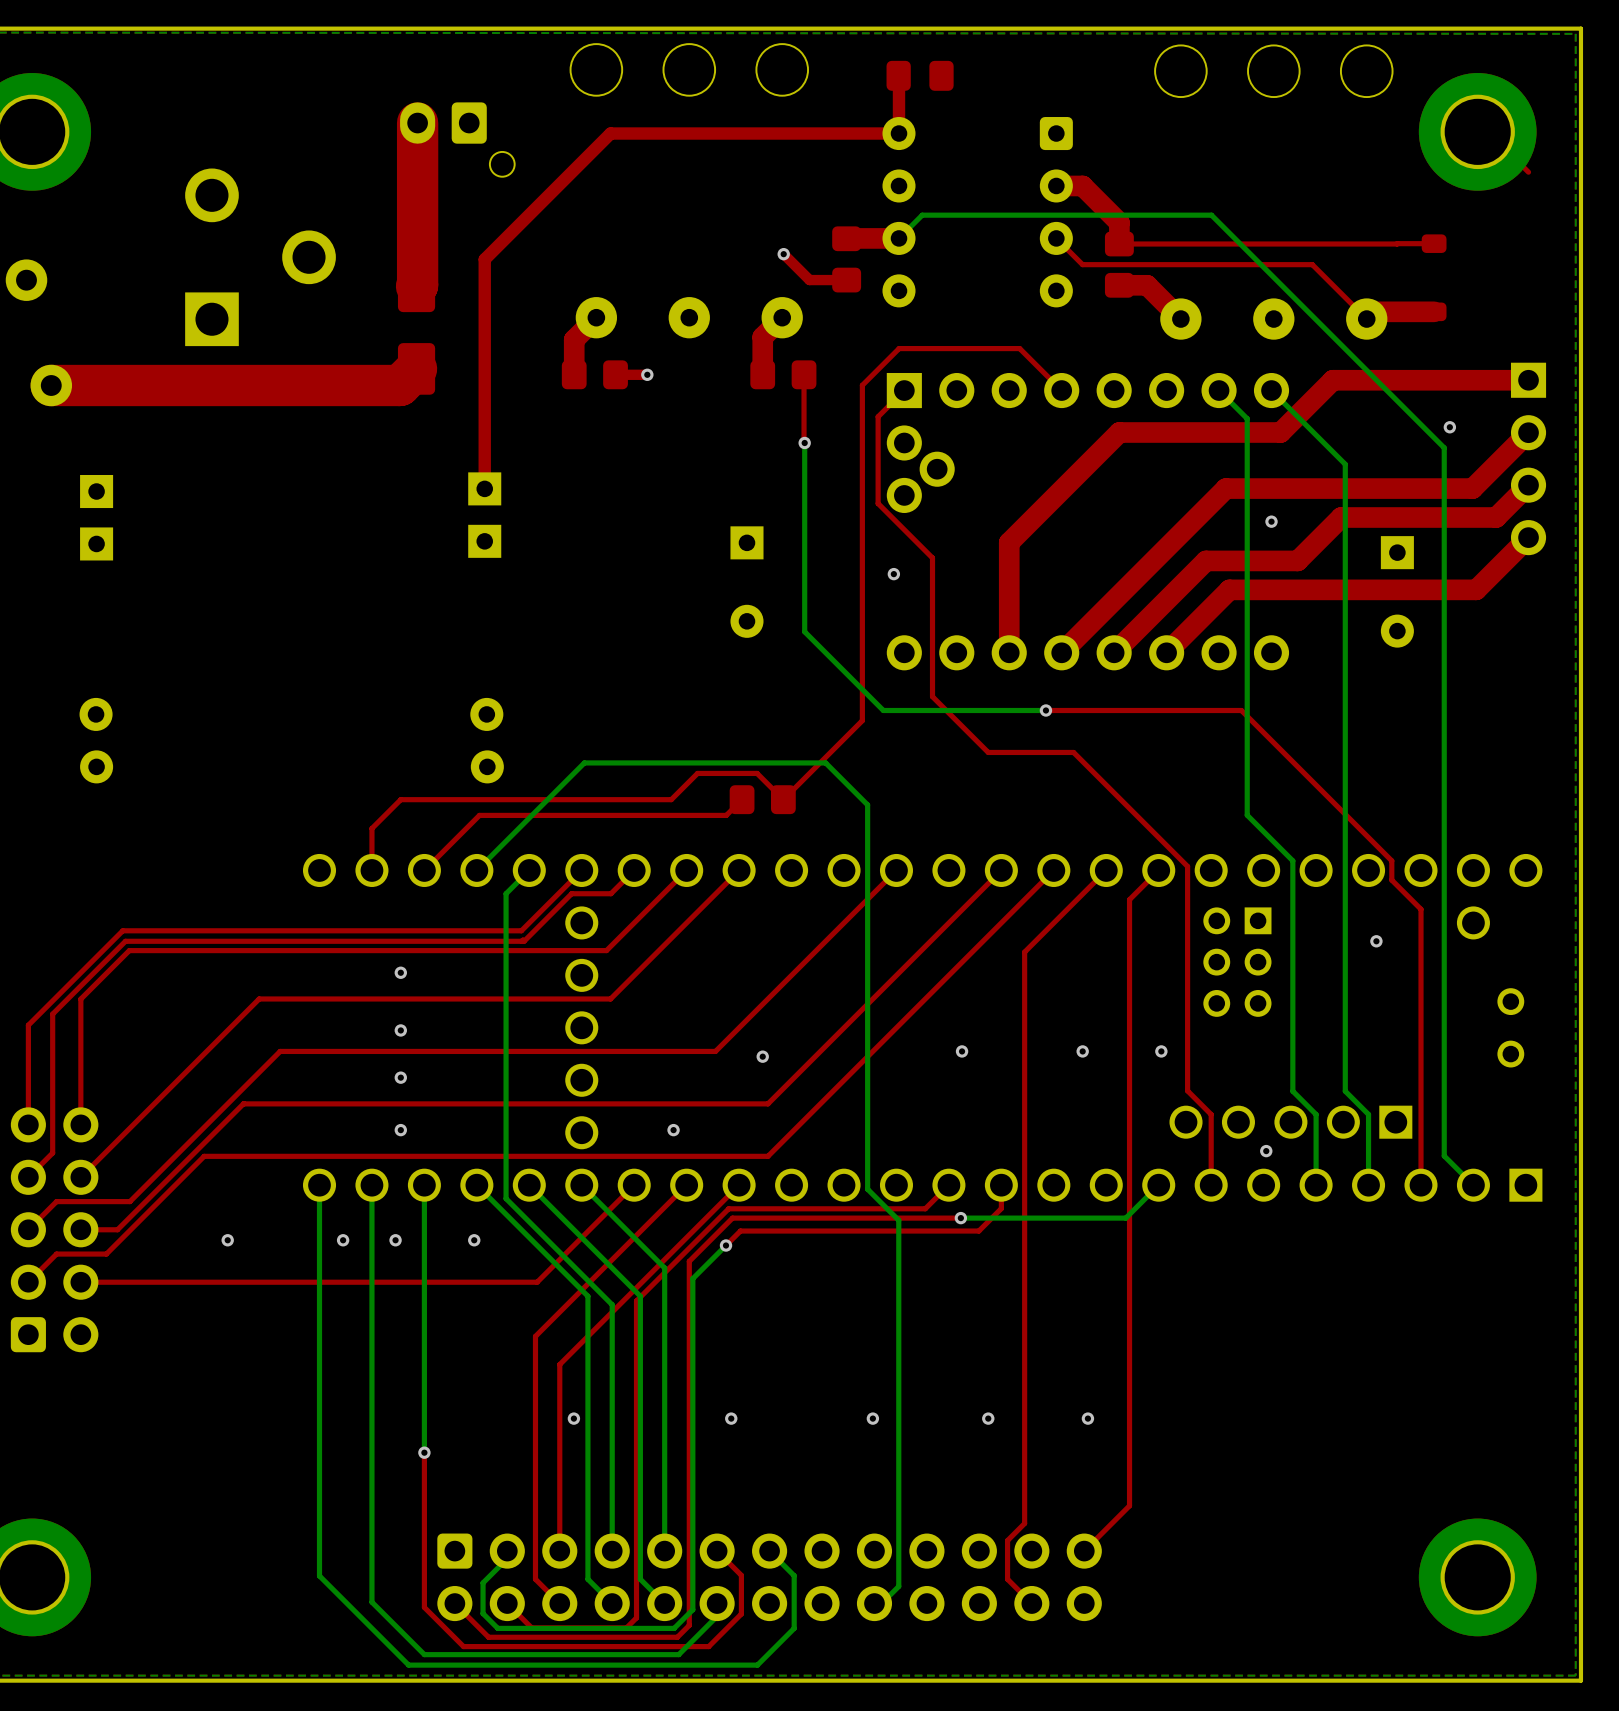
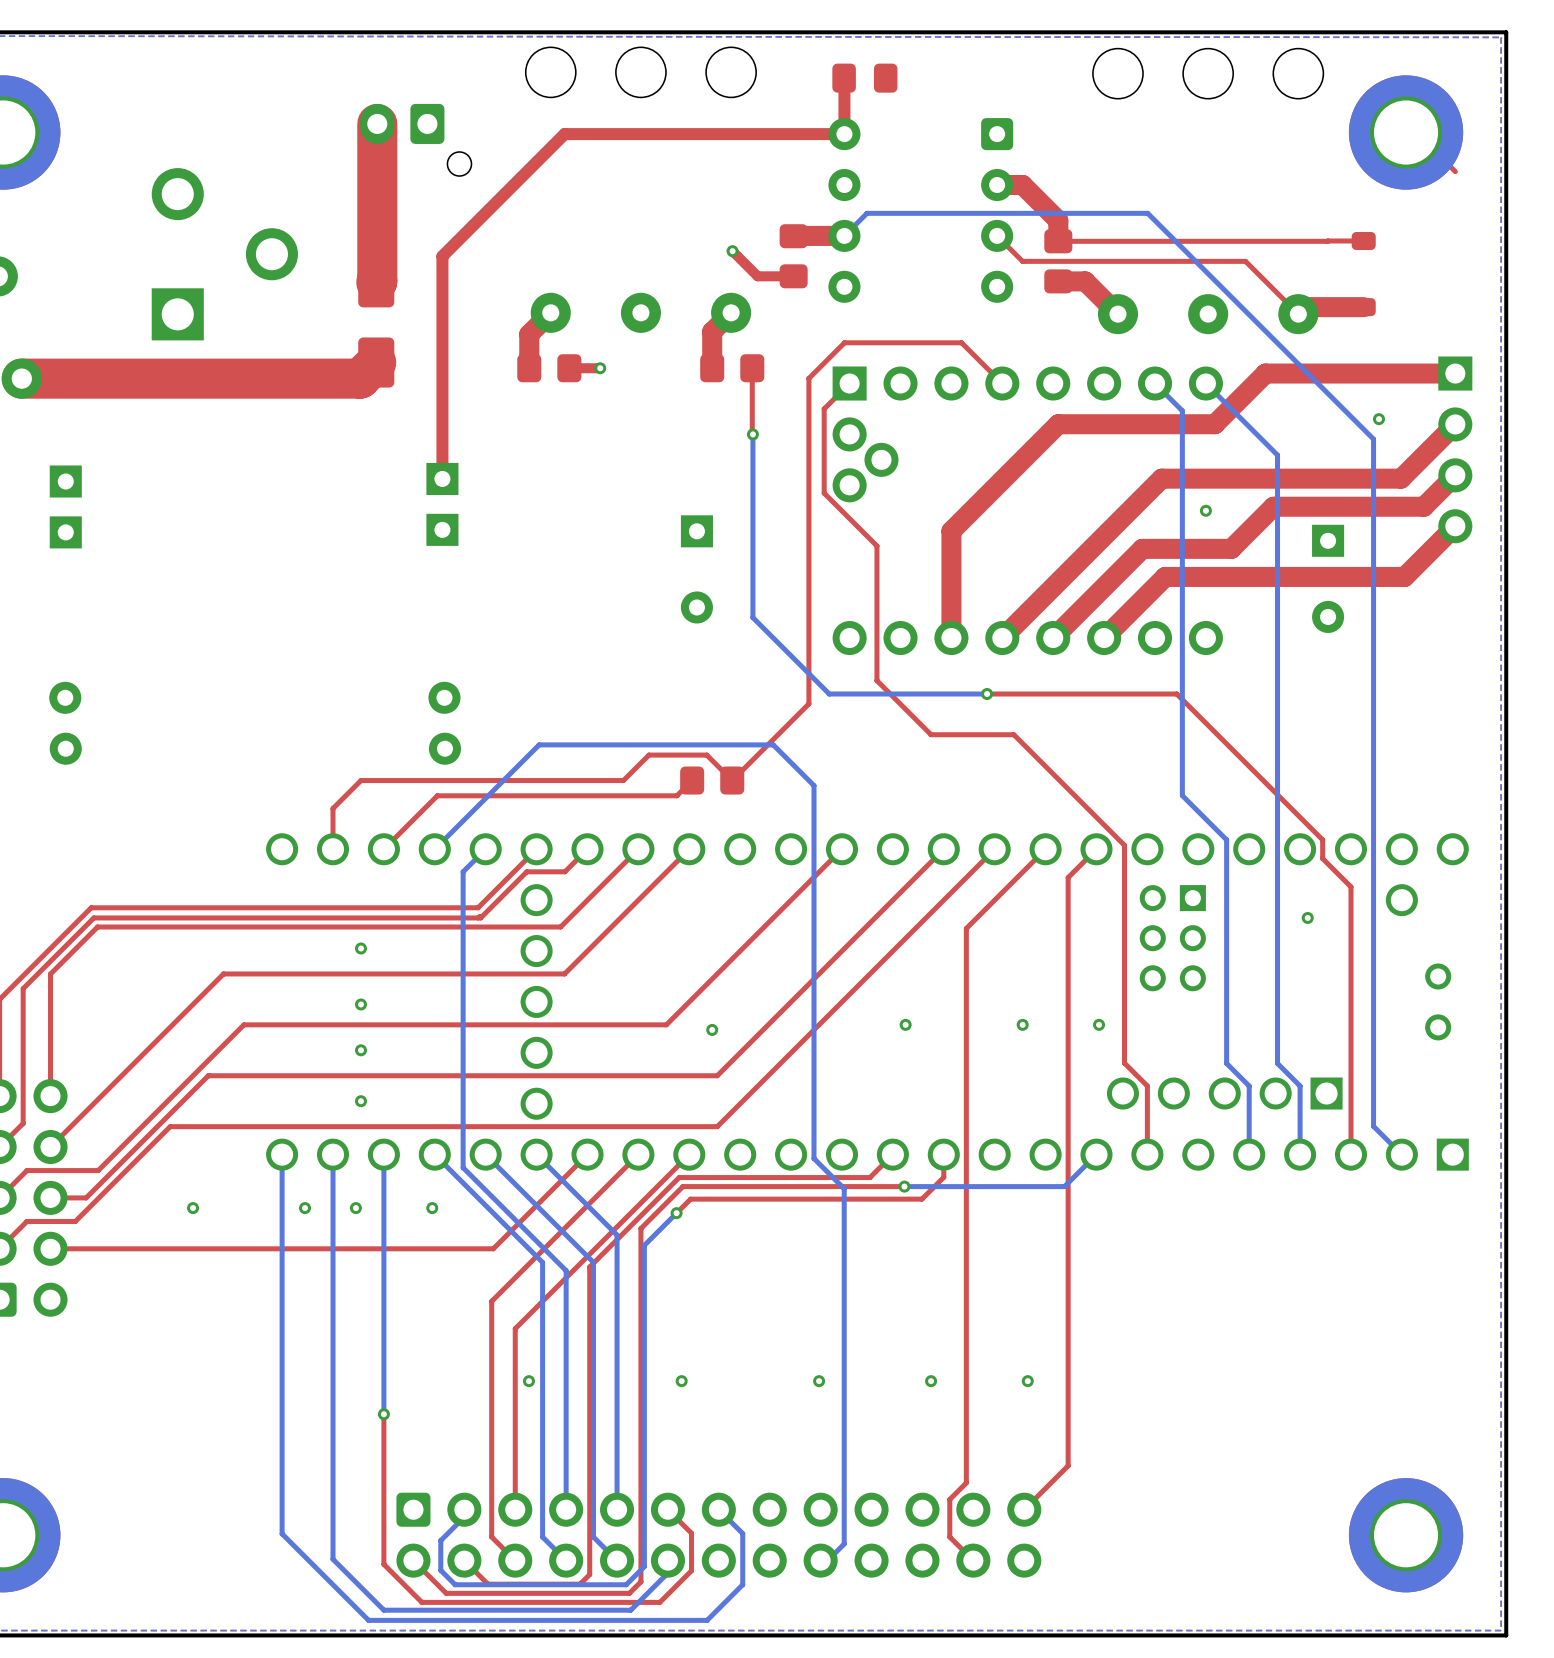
via: (893, 574) -> none
via: (673, 1130) -> none
via: (1266, 1151) -> none

